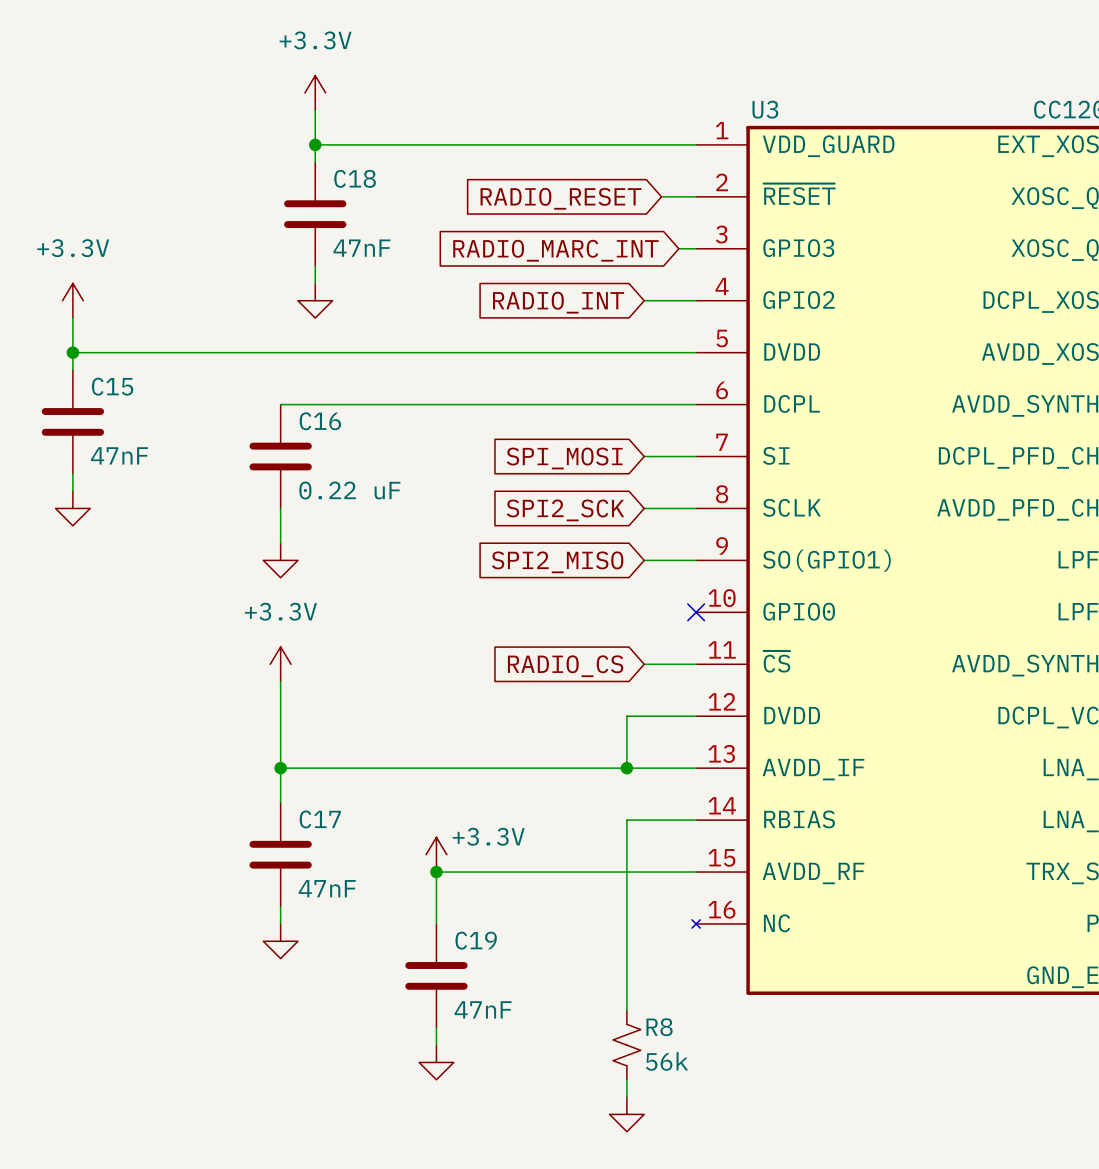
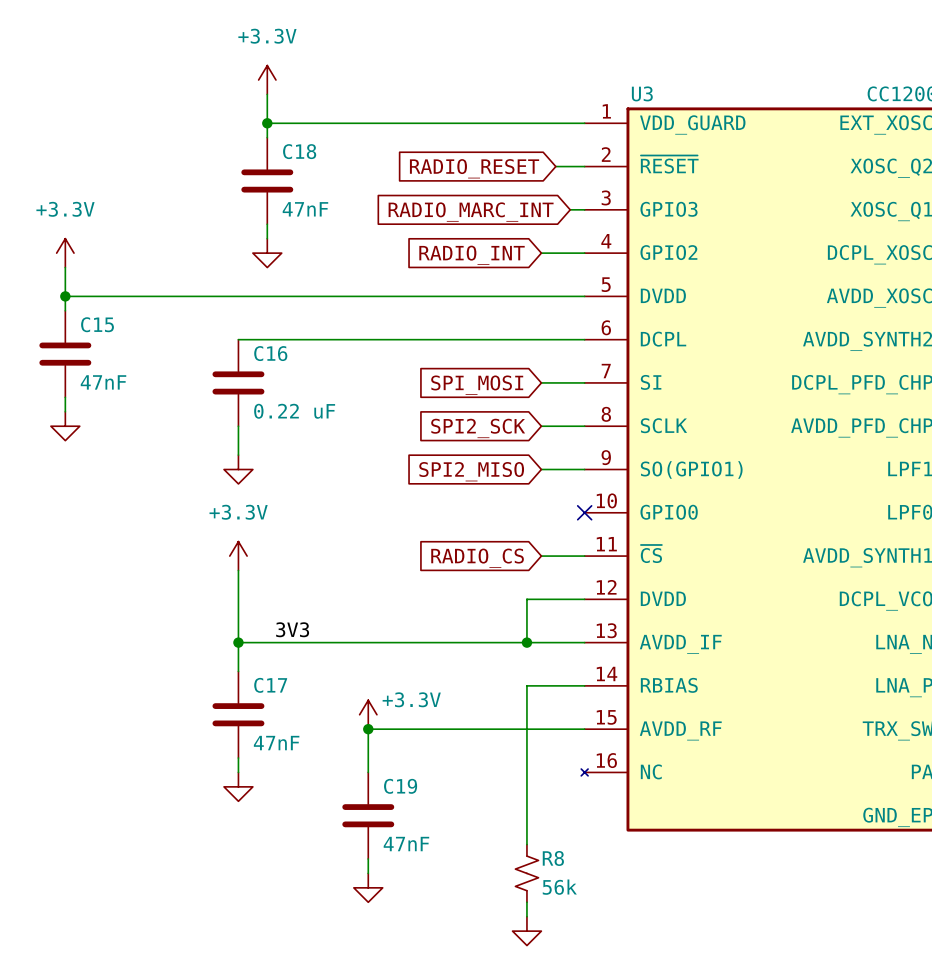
label: none -> 3V3 (292, 629)

